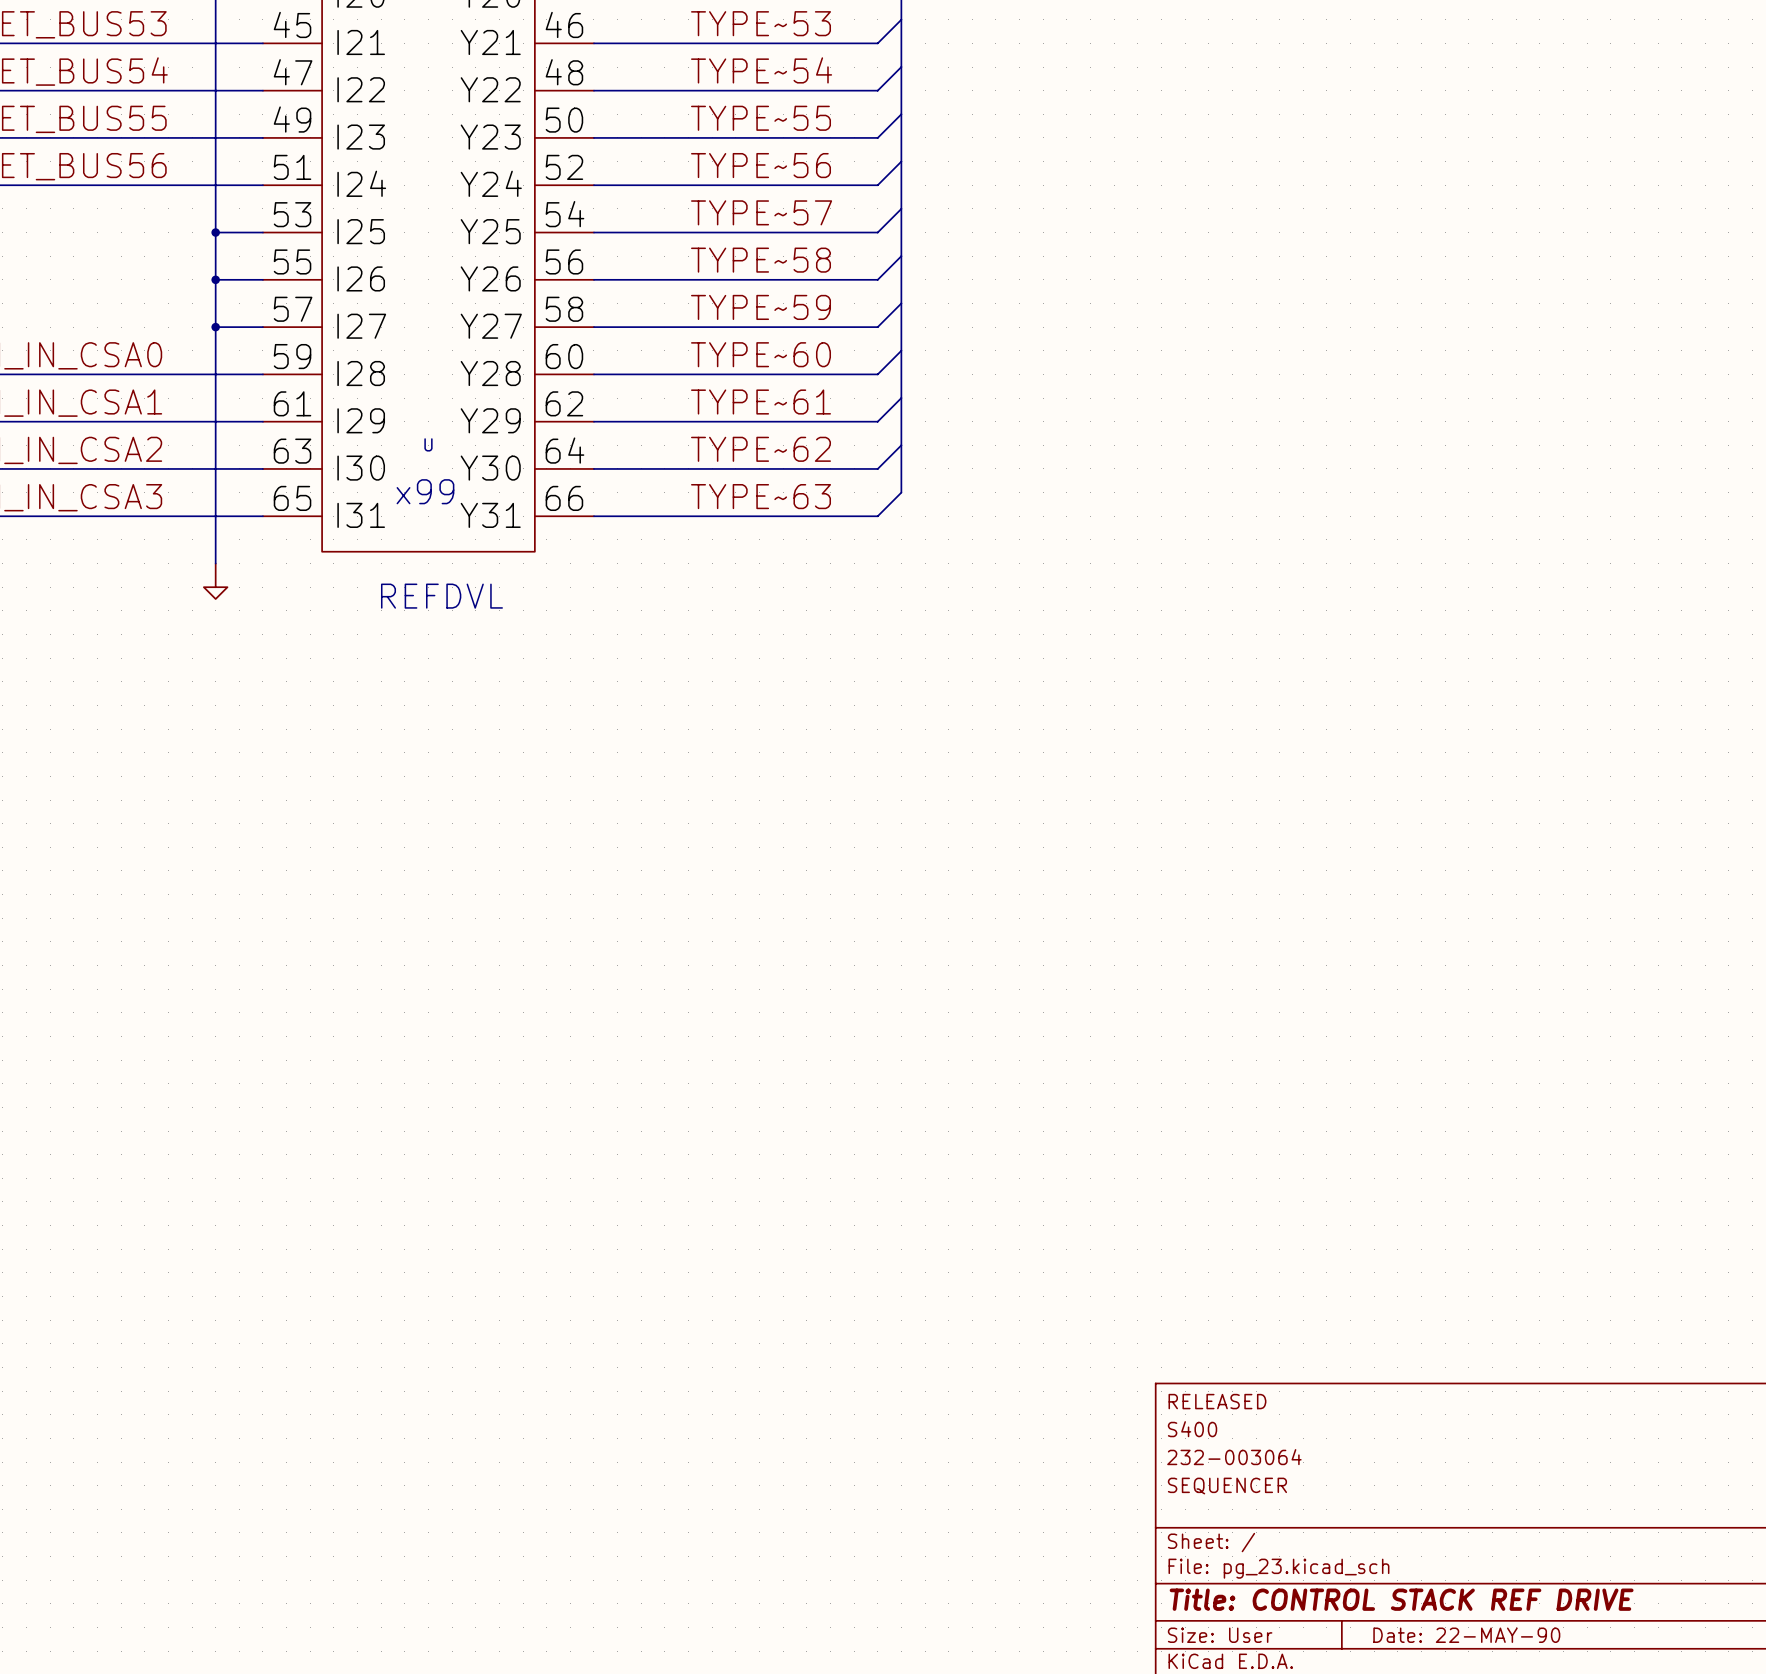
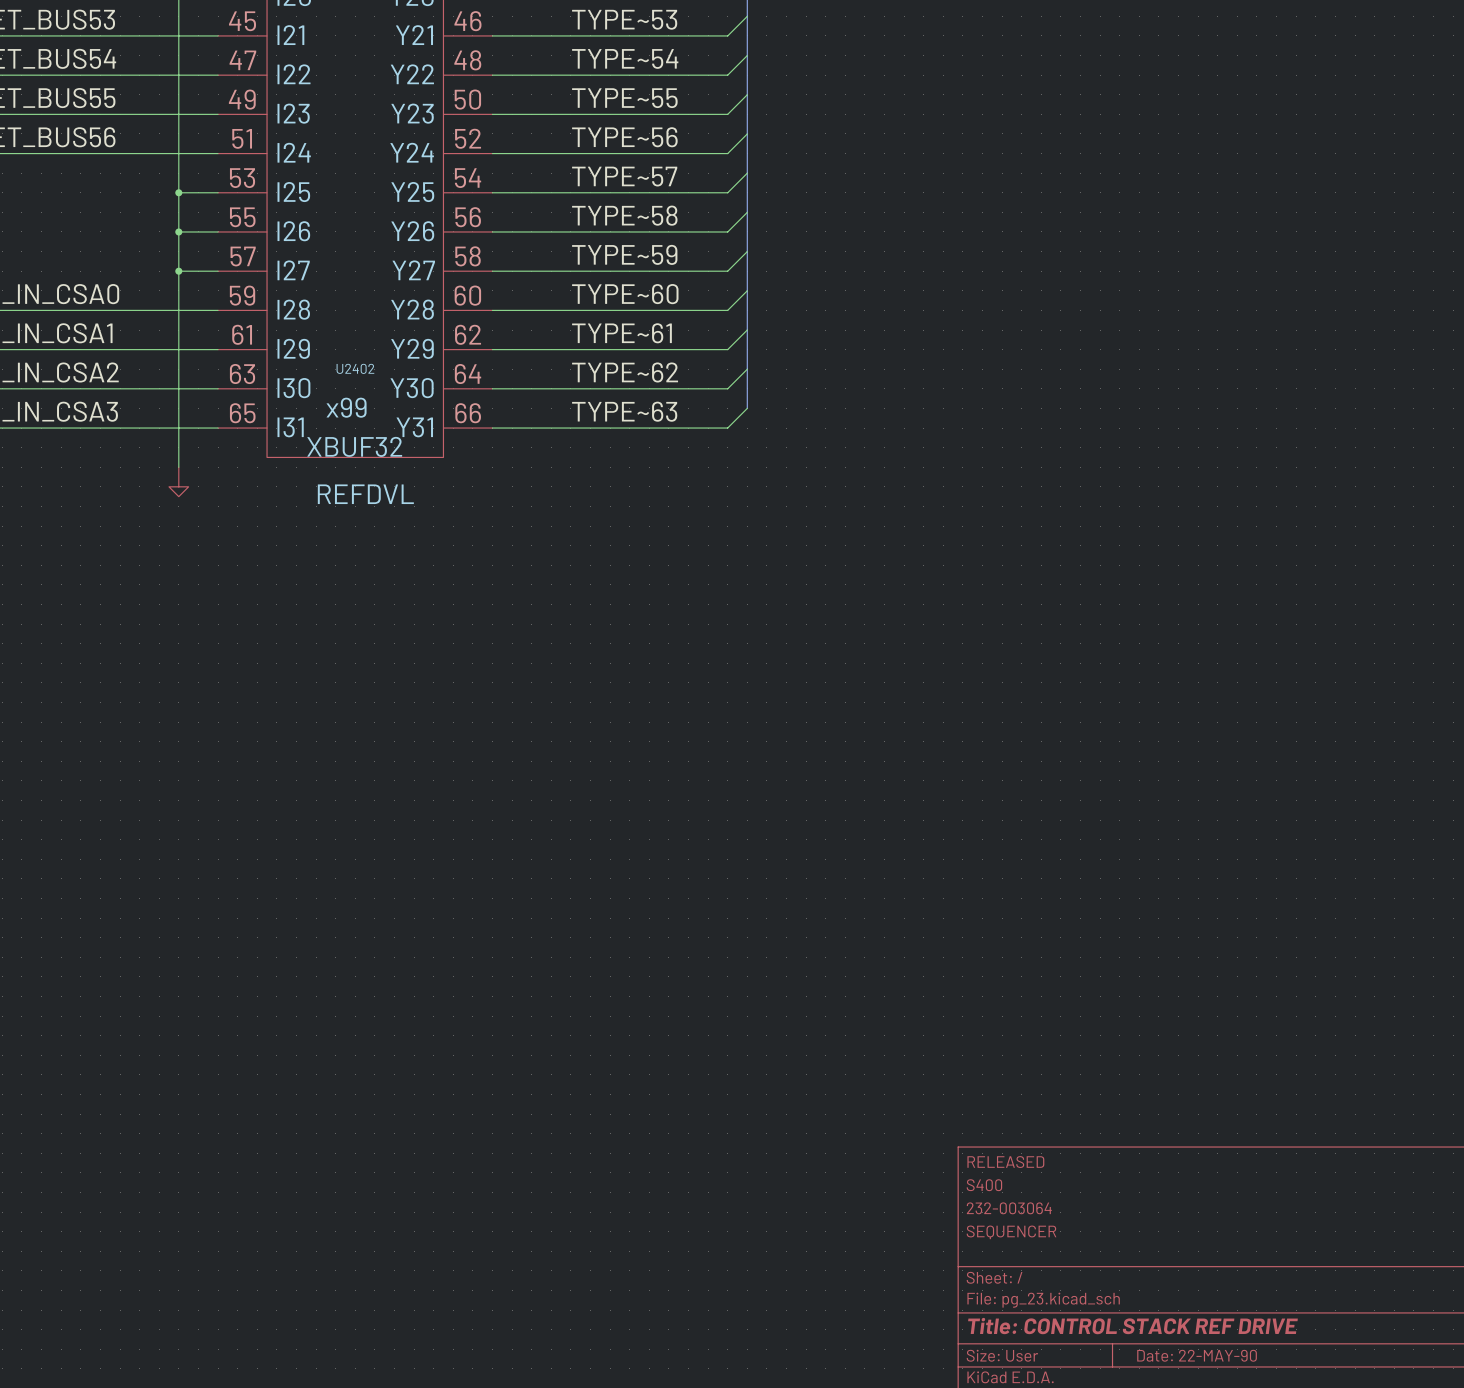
U name: U (428, 444) -> U2402 (355, 368)
U value: none -> XBUF32 (354, 446)

